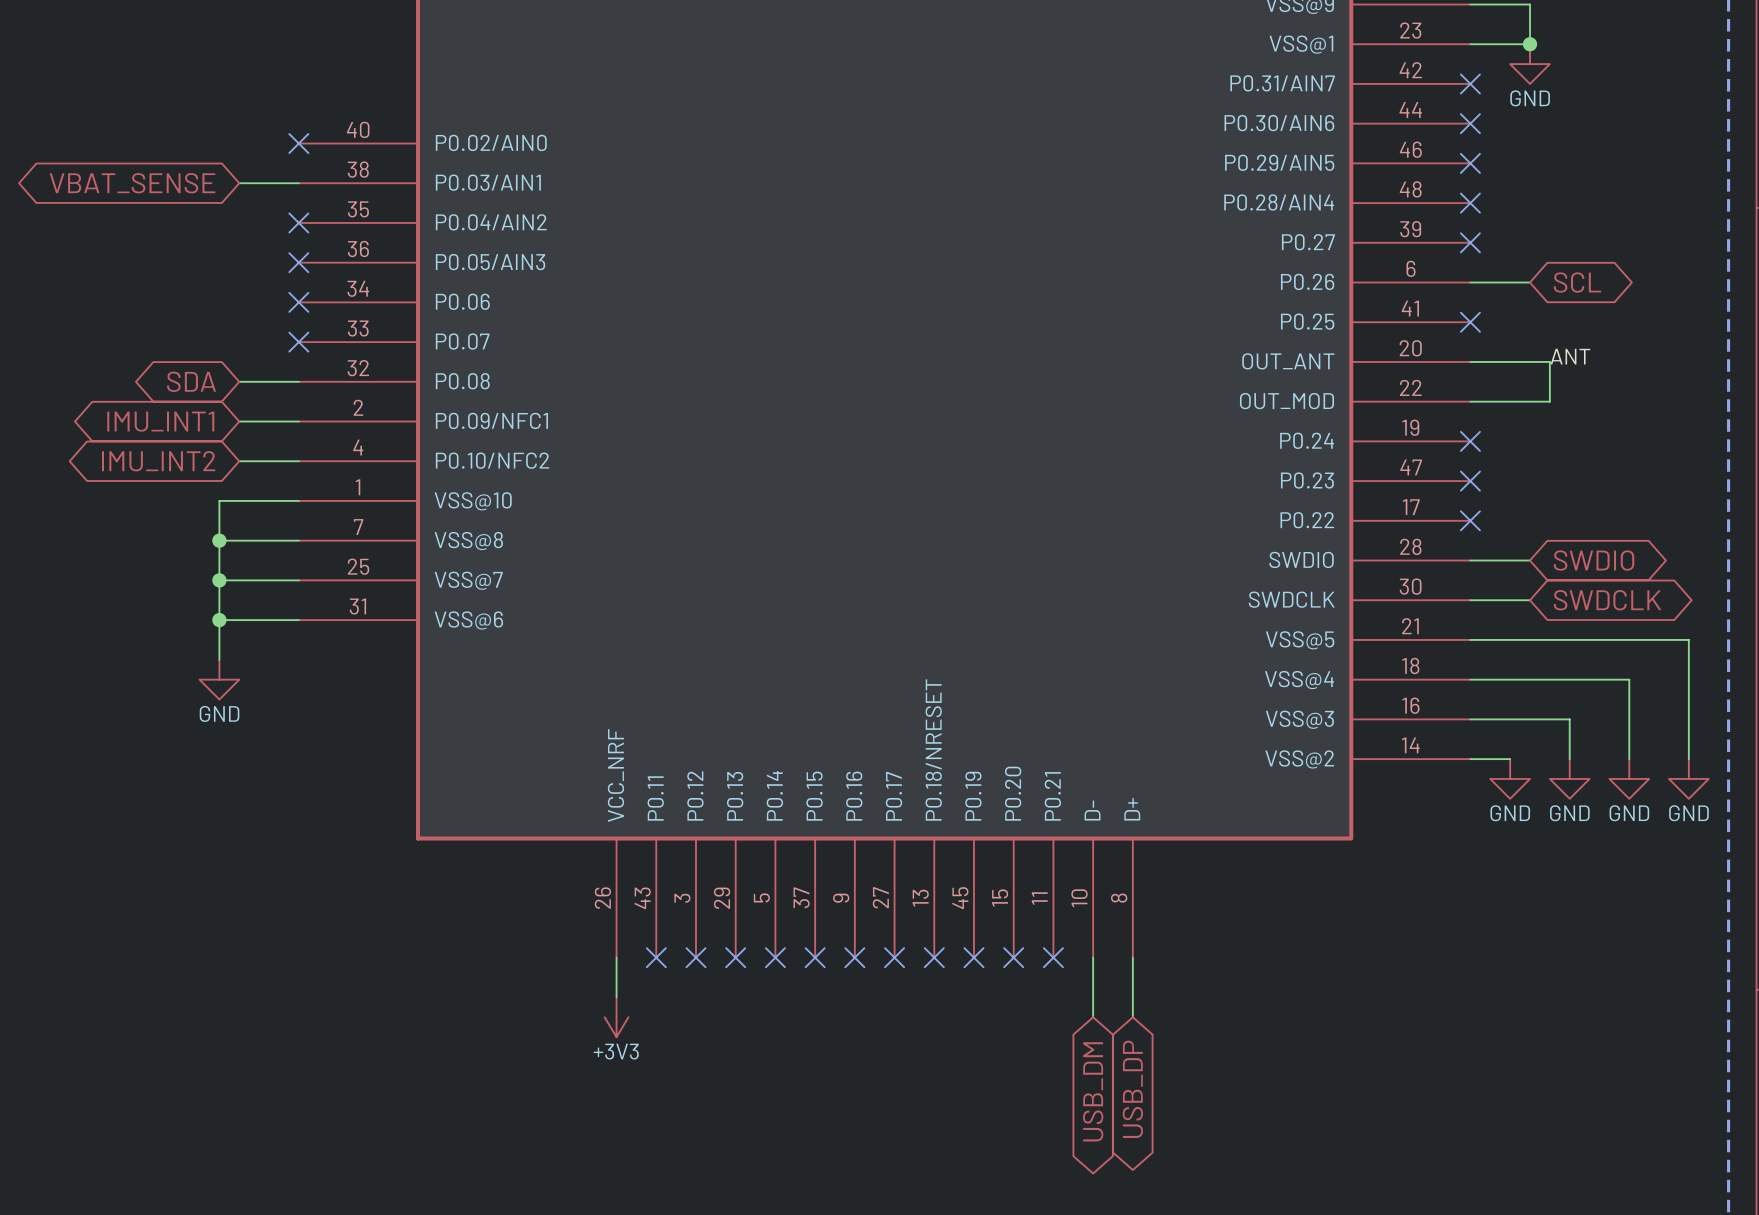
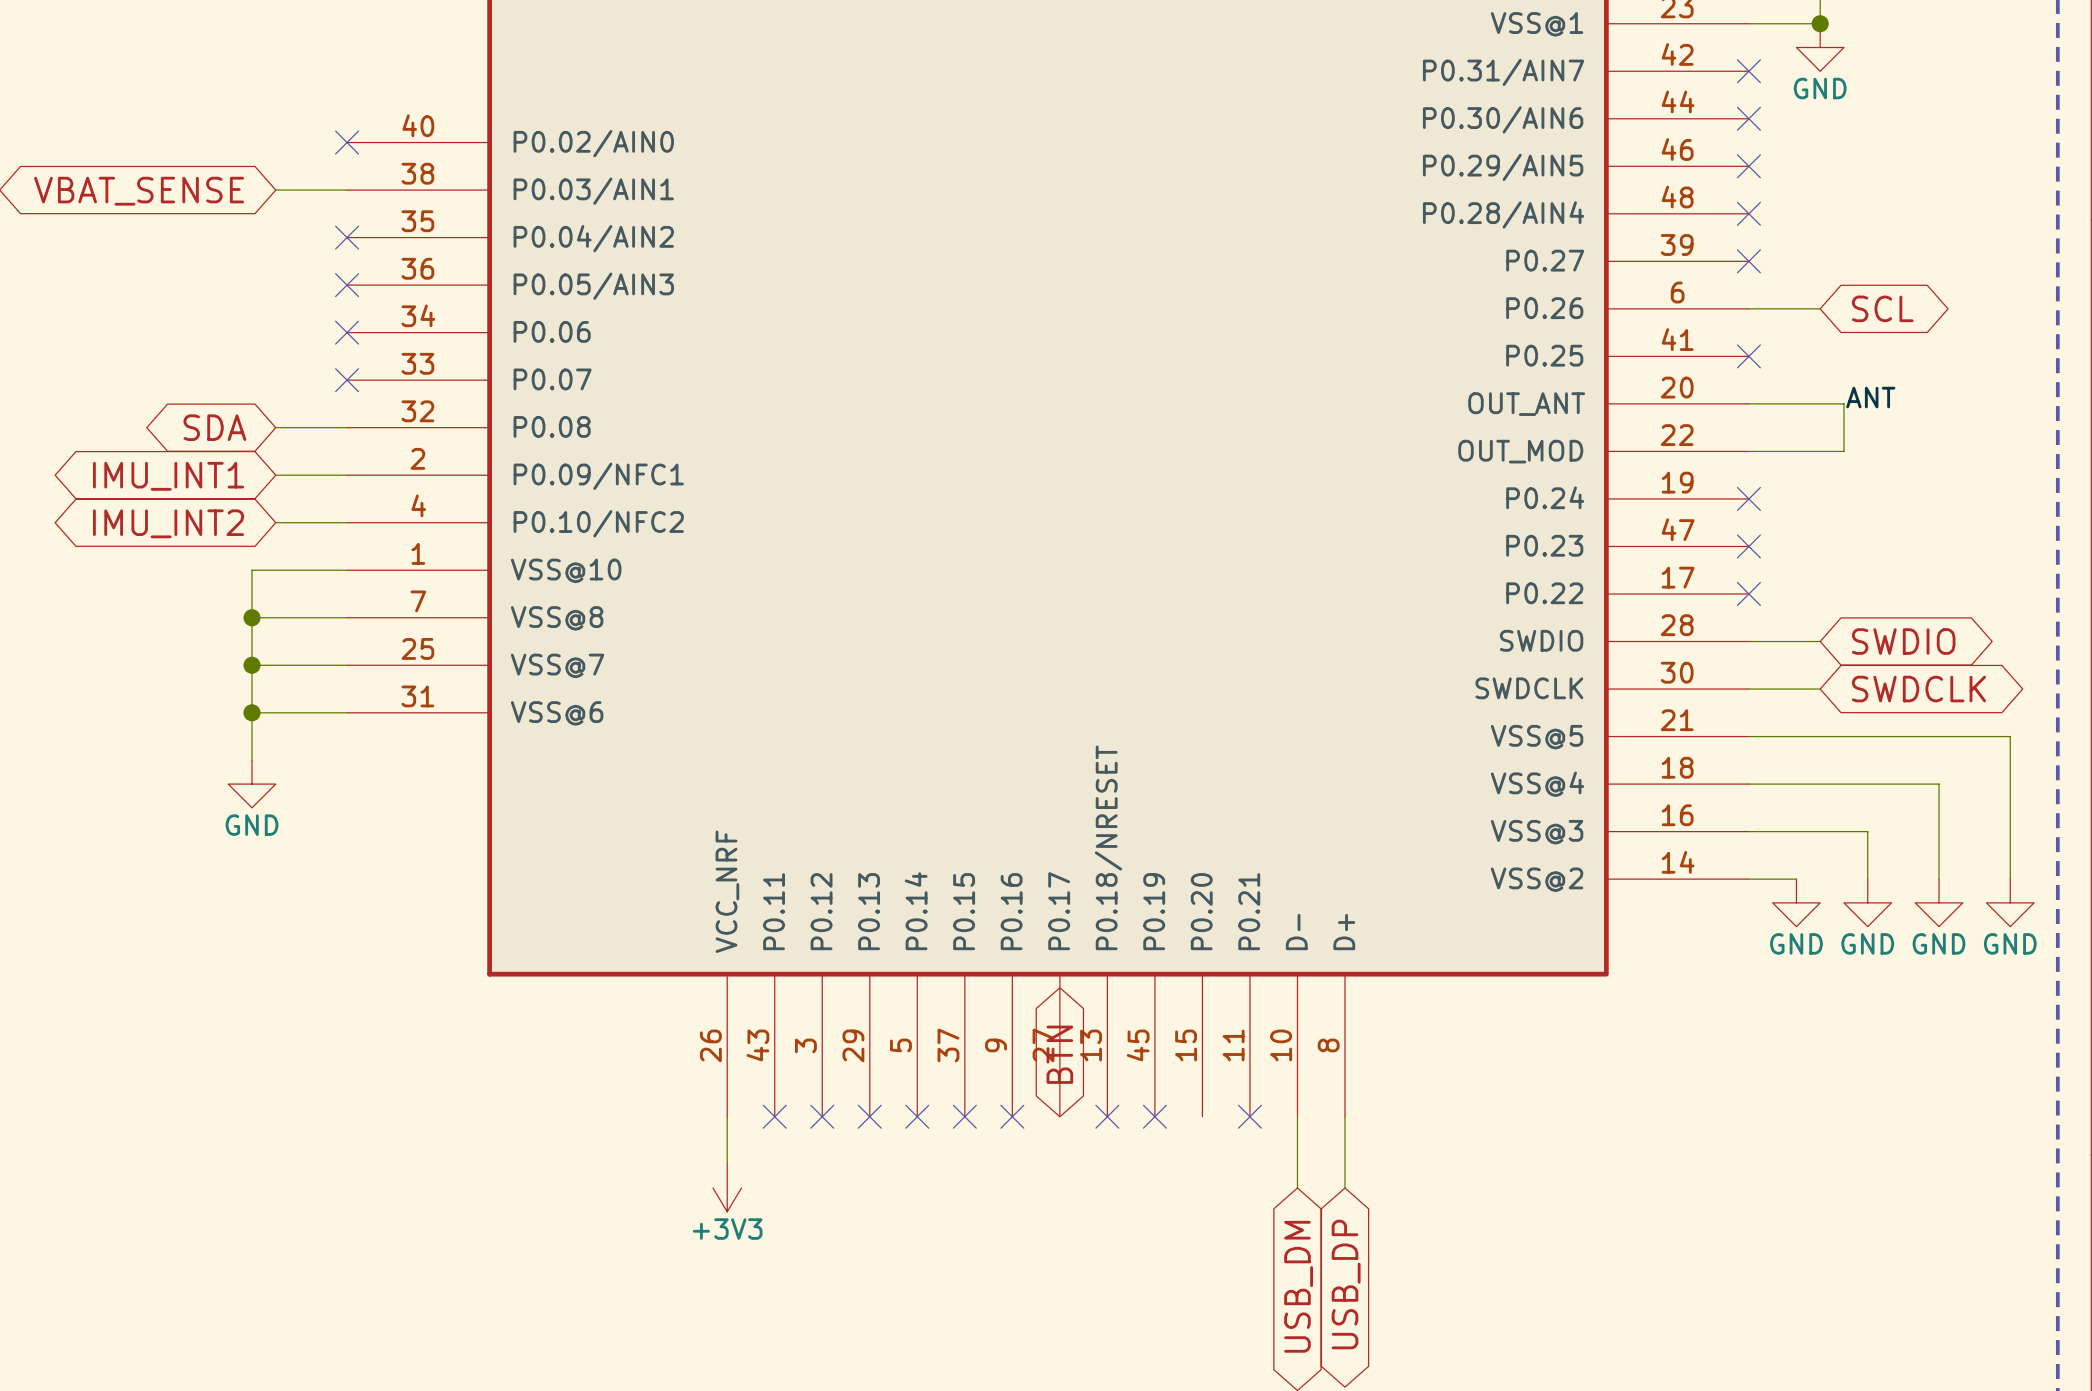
global label: none -> BTN (1059, 1054)
no-connect mark: (894, 957) -> none
no-connect mark: (1013, 957) -> none

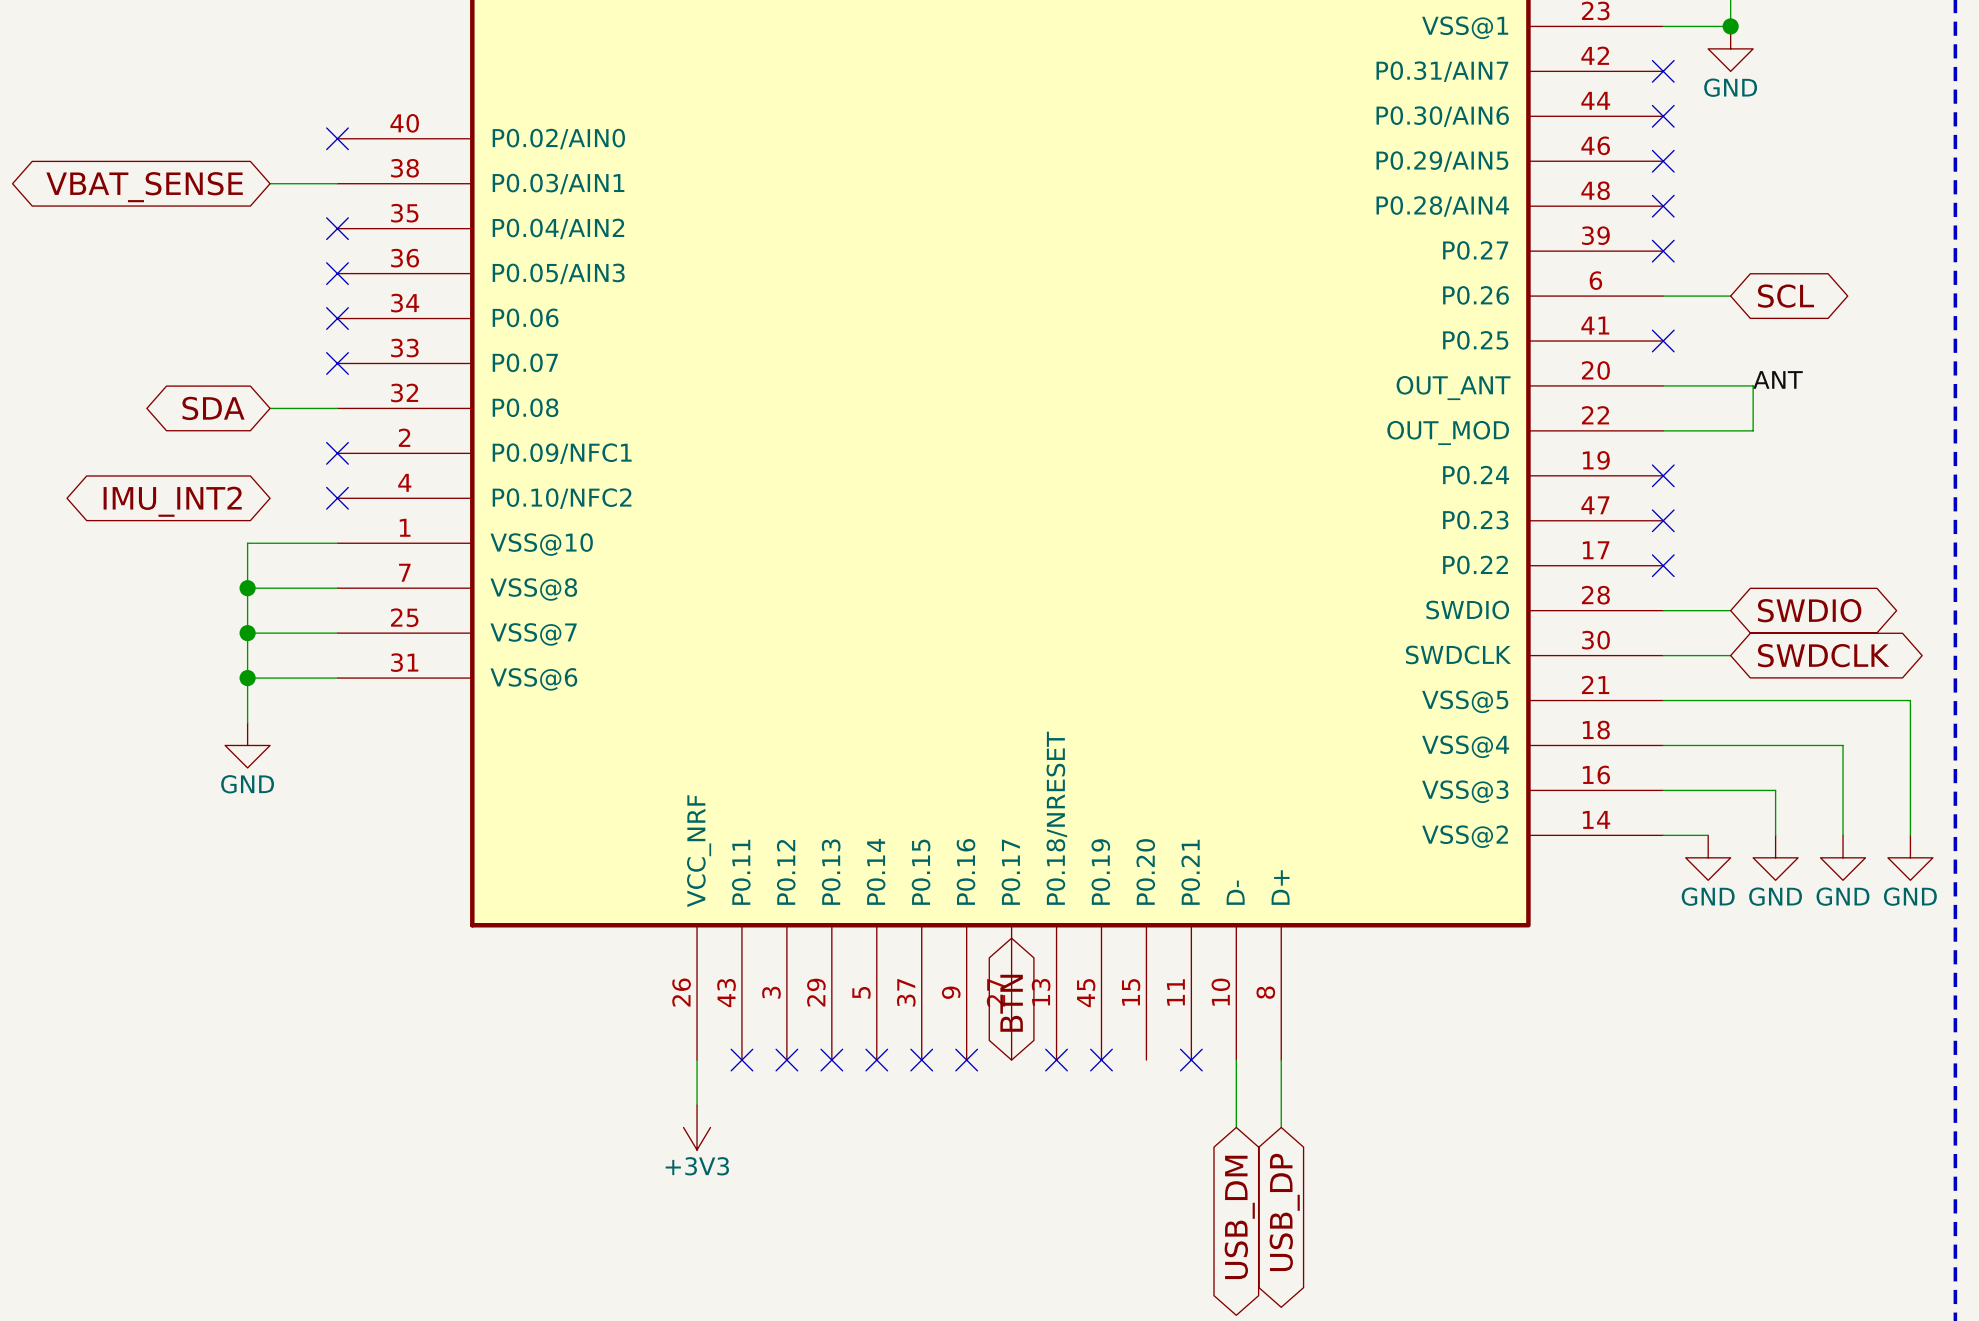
wire: (275, 475) (347, 475) -> none
no-connect mark: none -> (337, 453)
global label: IMU_INT1 (168, 476) -> none
wire: (275, 522) (347, 522) -> none
no-connect mark: none -> (337, 498)

